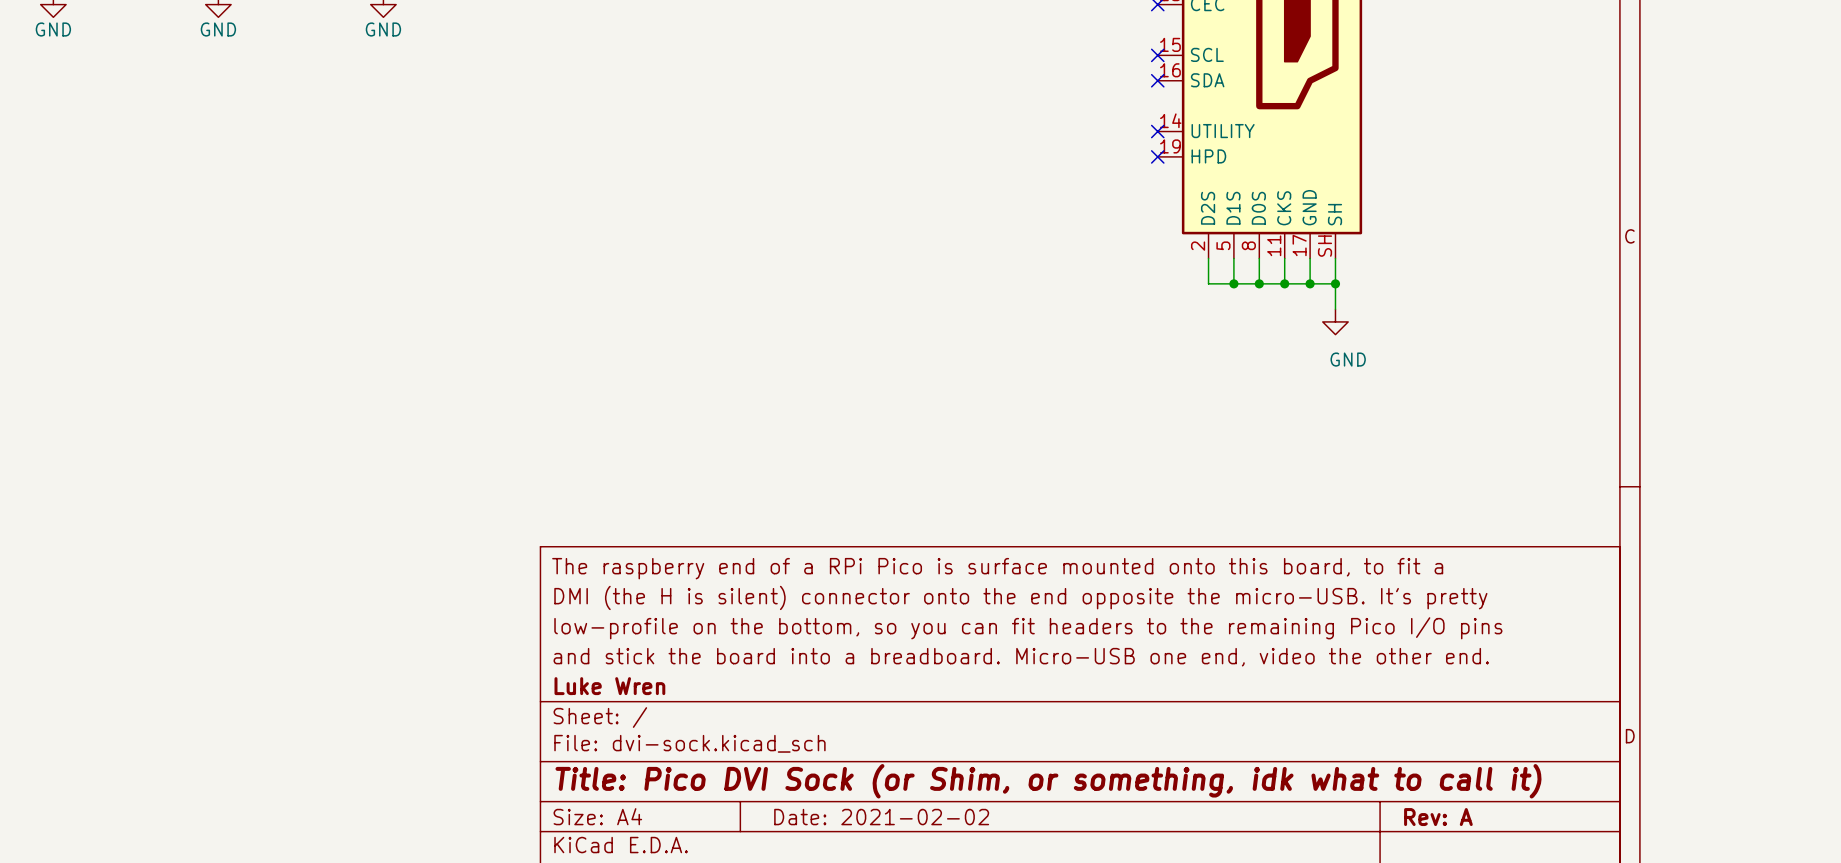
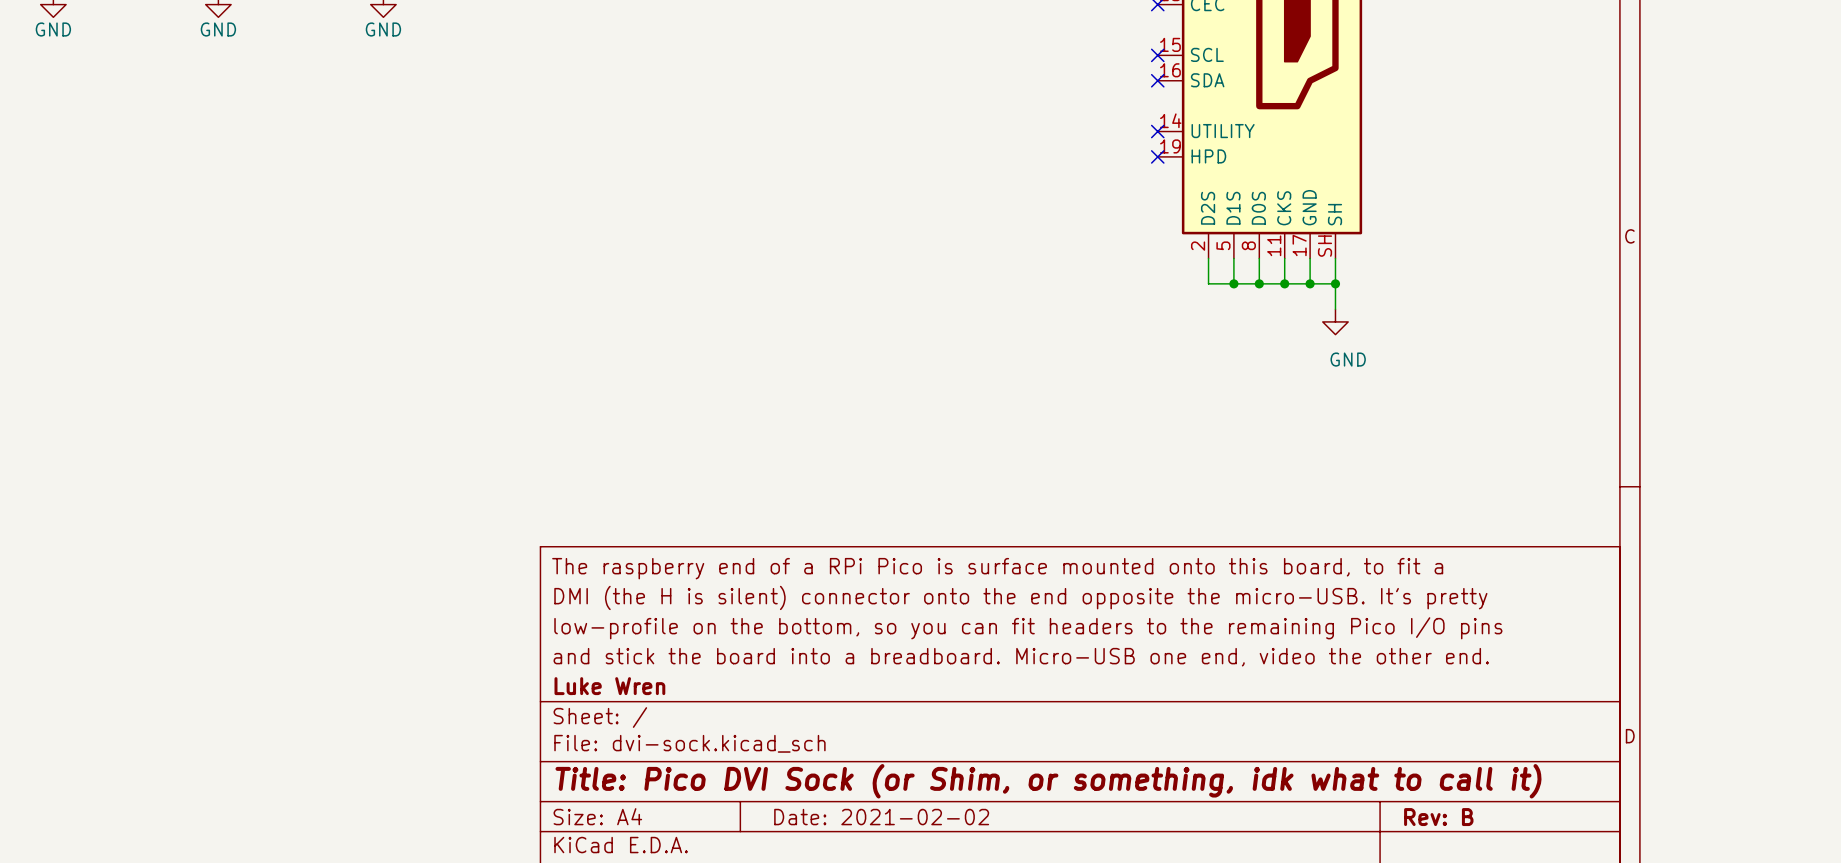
title block: Rev: A (1438, 817) -> Rev: B (1438, 817)

